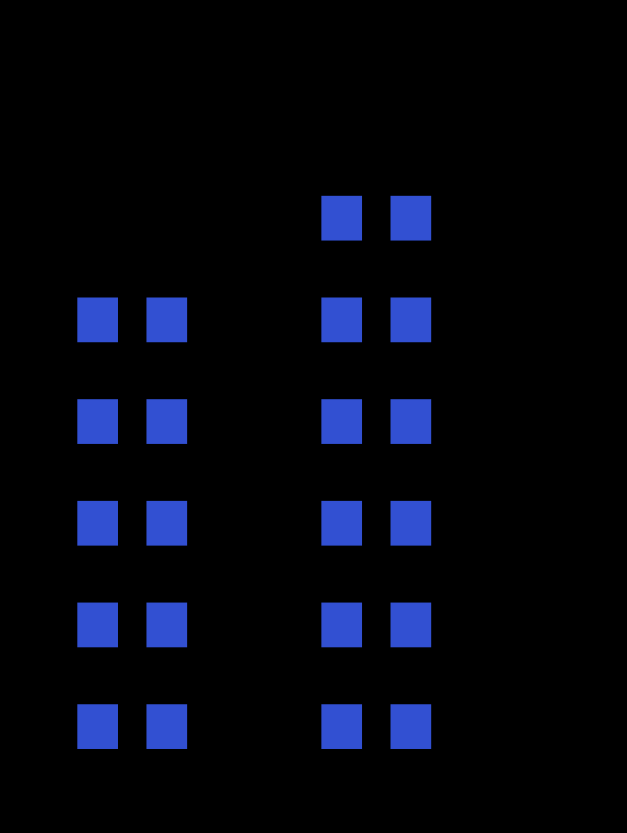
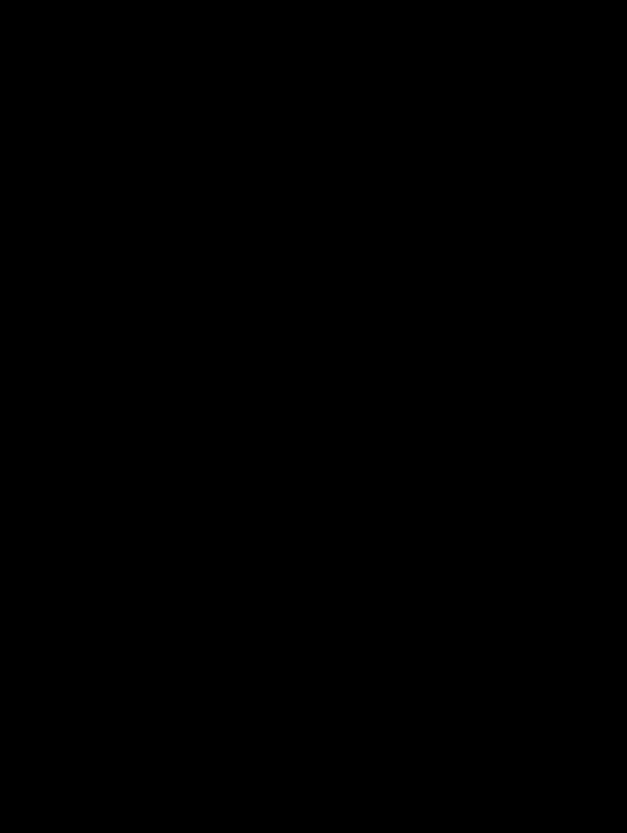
part: (376, 218) -> none
part: (132, 319) -> none
part: (376, 319) -> none
part: (132, 421) -> none
part: (376, 421) -> none
part: (132, 523) -> none
part: (376, 523) -> none
part: (132, 624) -> none
part: (376, 624) -> none
part: (132, 726) -> none
part: (376, 726) -> none

